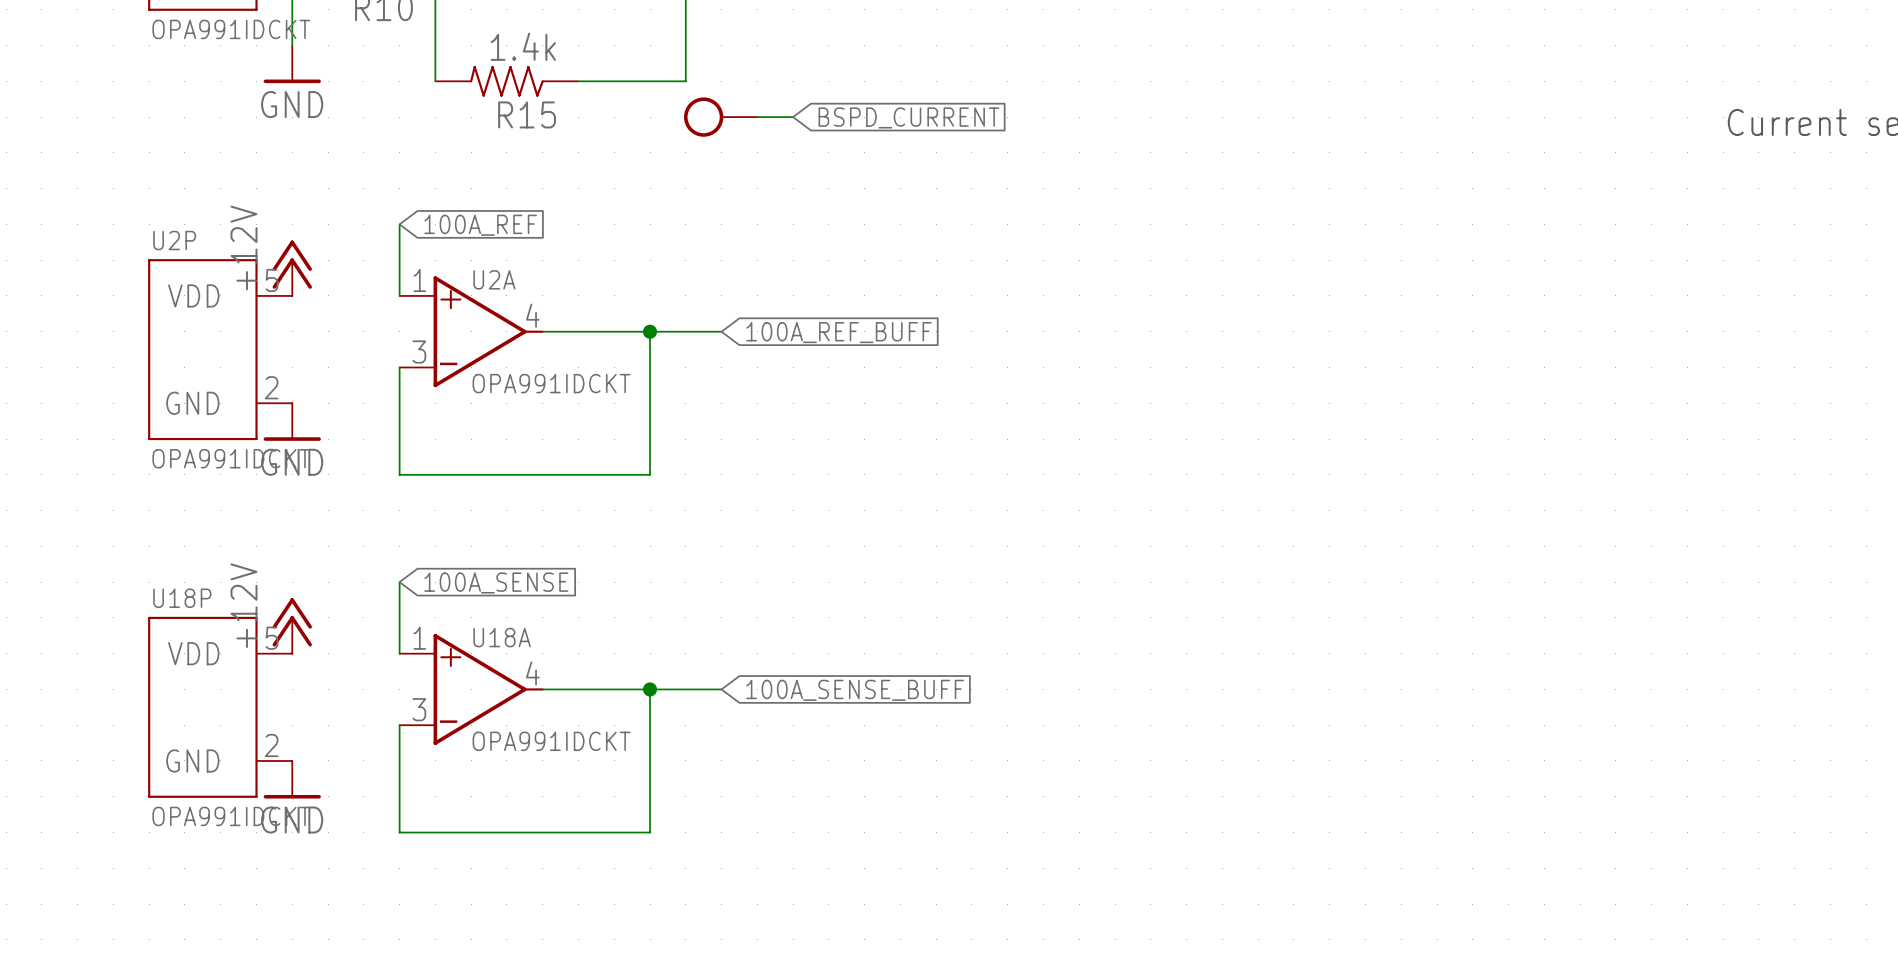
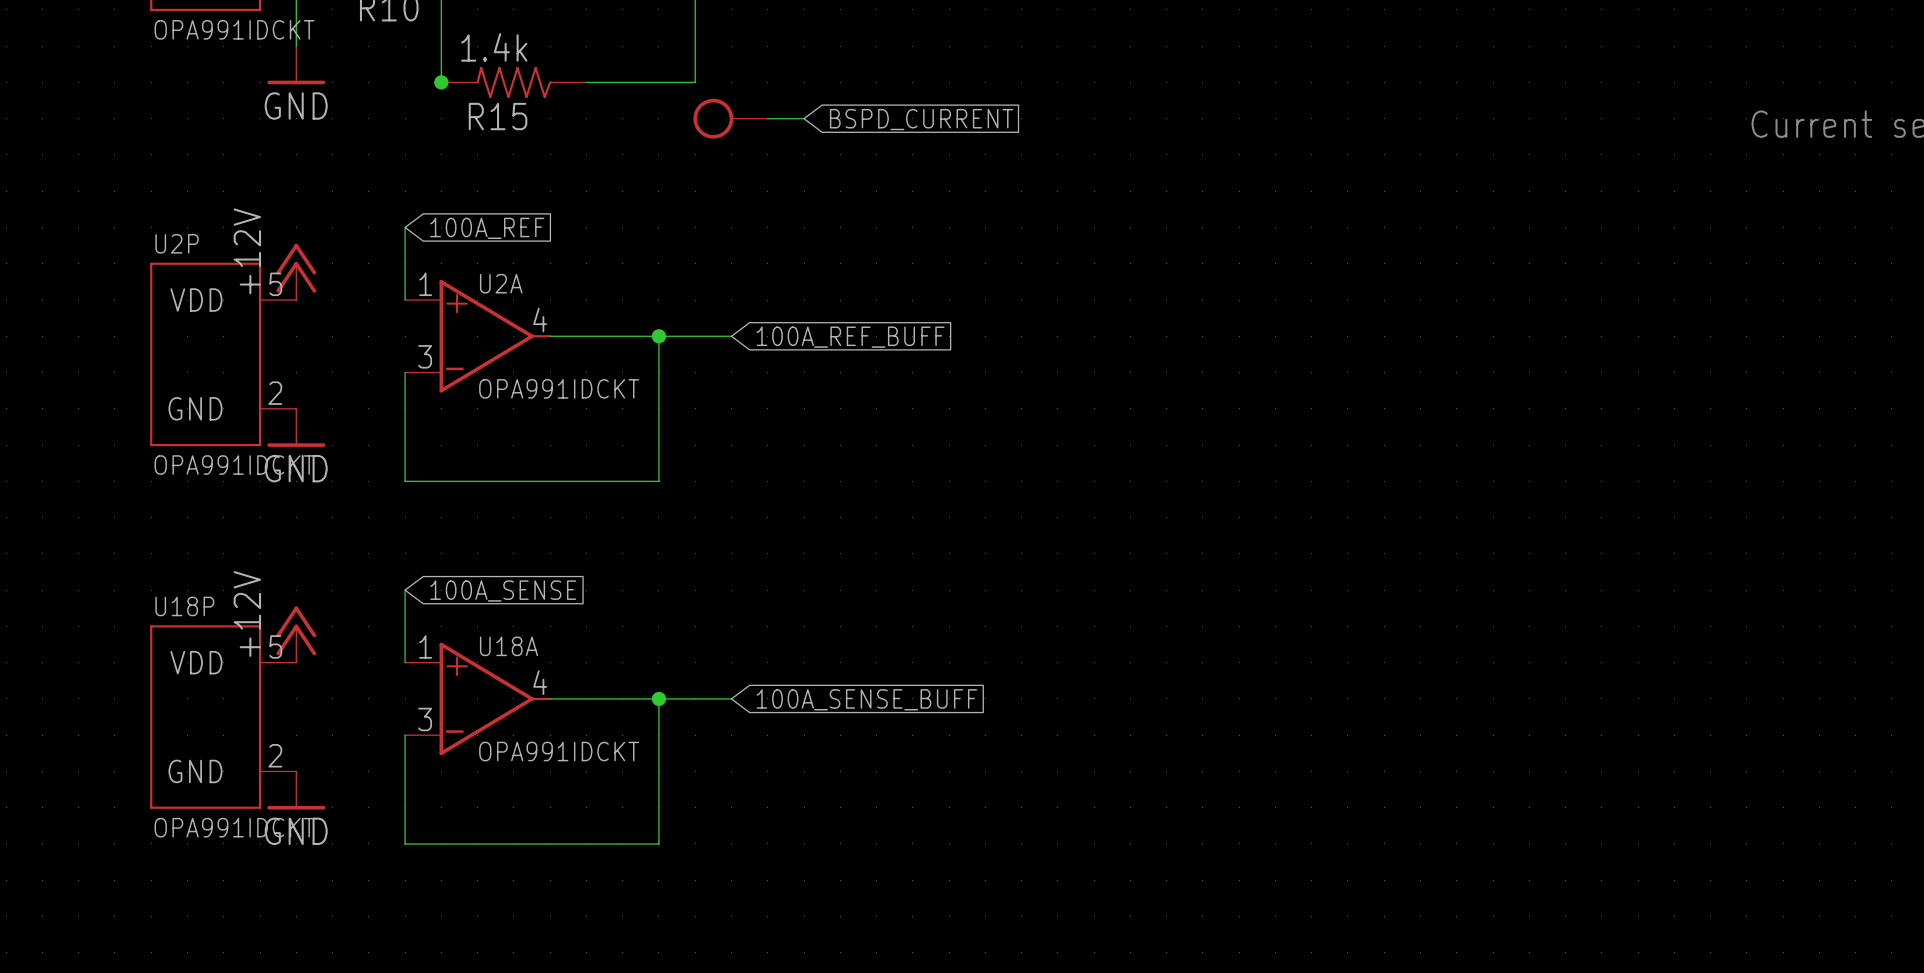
R15 value position: 1.4k (523, 46) -> 1.4k (494, 47)
junction: none -> (441, 82)
R15 name position: R15 (527, 114) -> R15 (498, 116)

